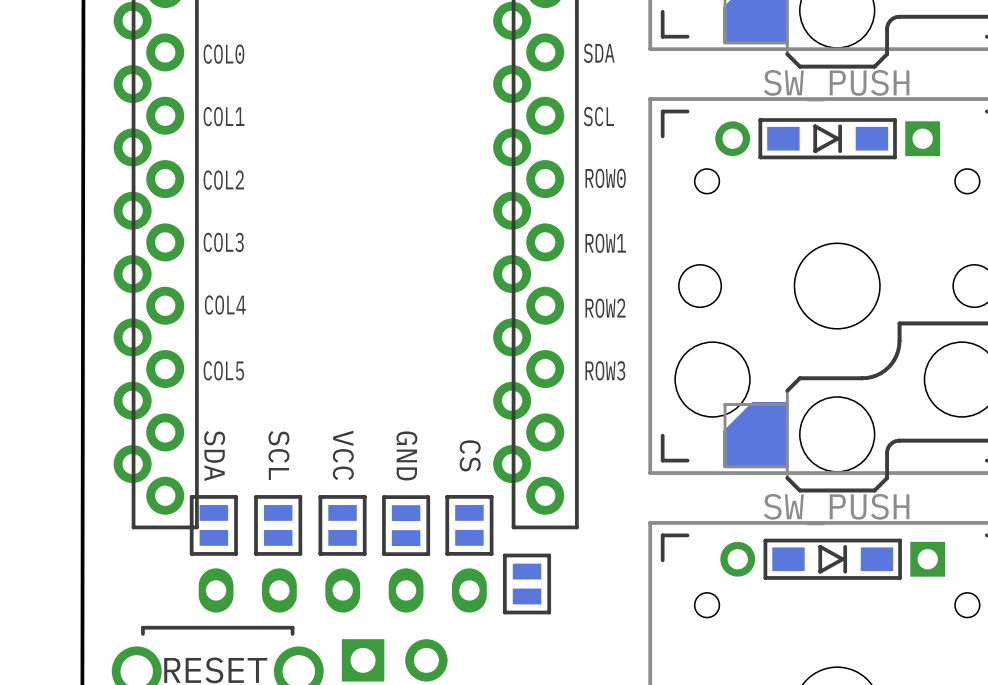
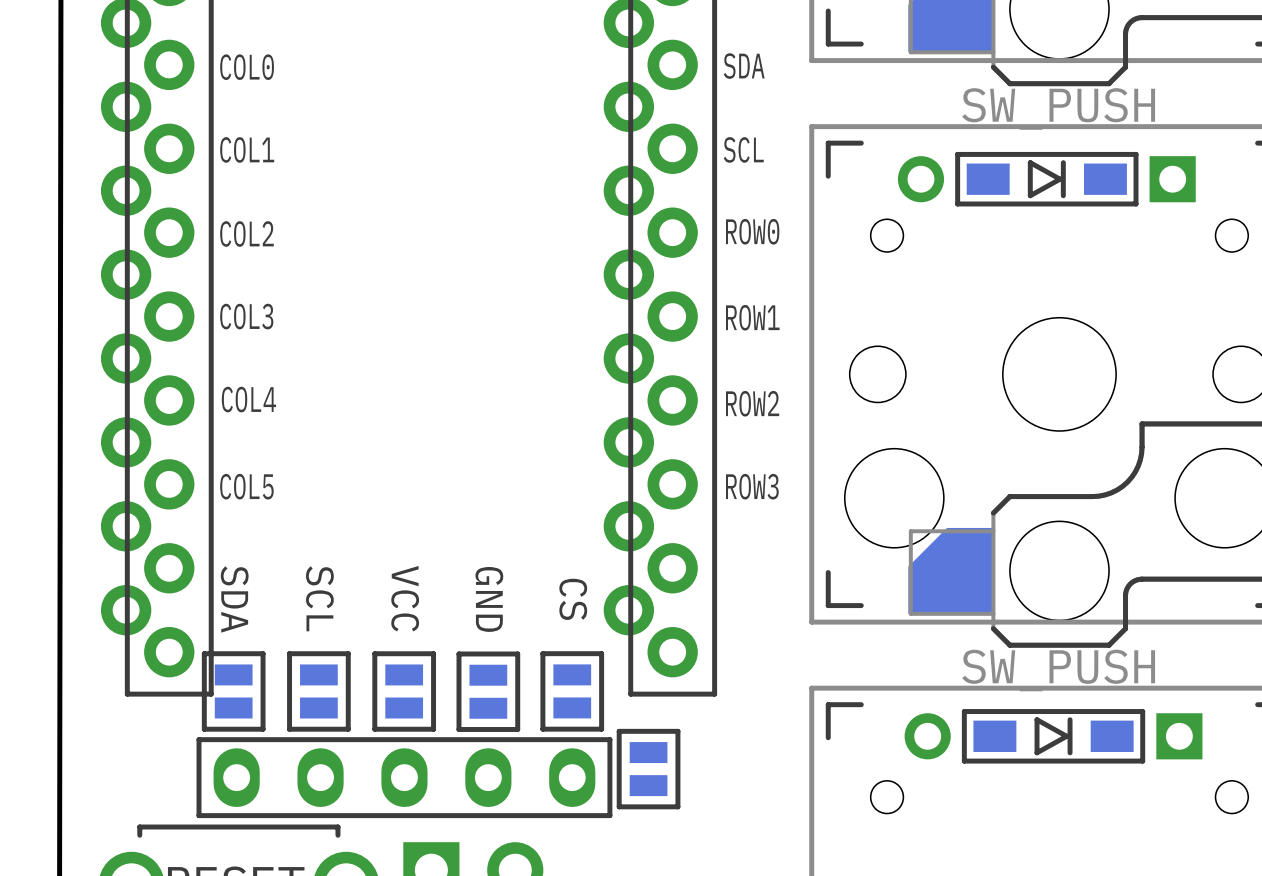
part footprint: [198, 568, 487, 613] -> [196, 737, 613, 819]

